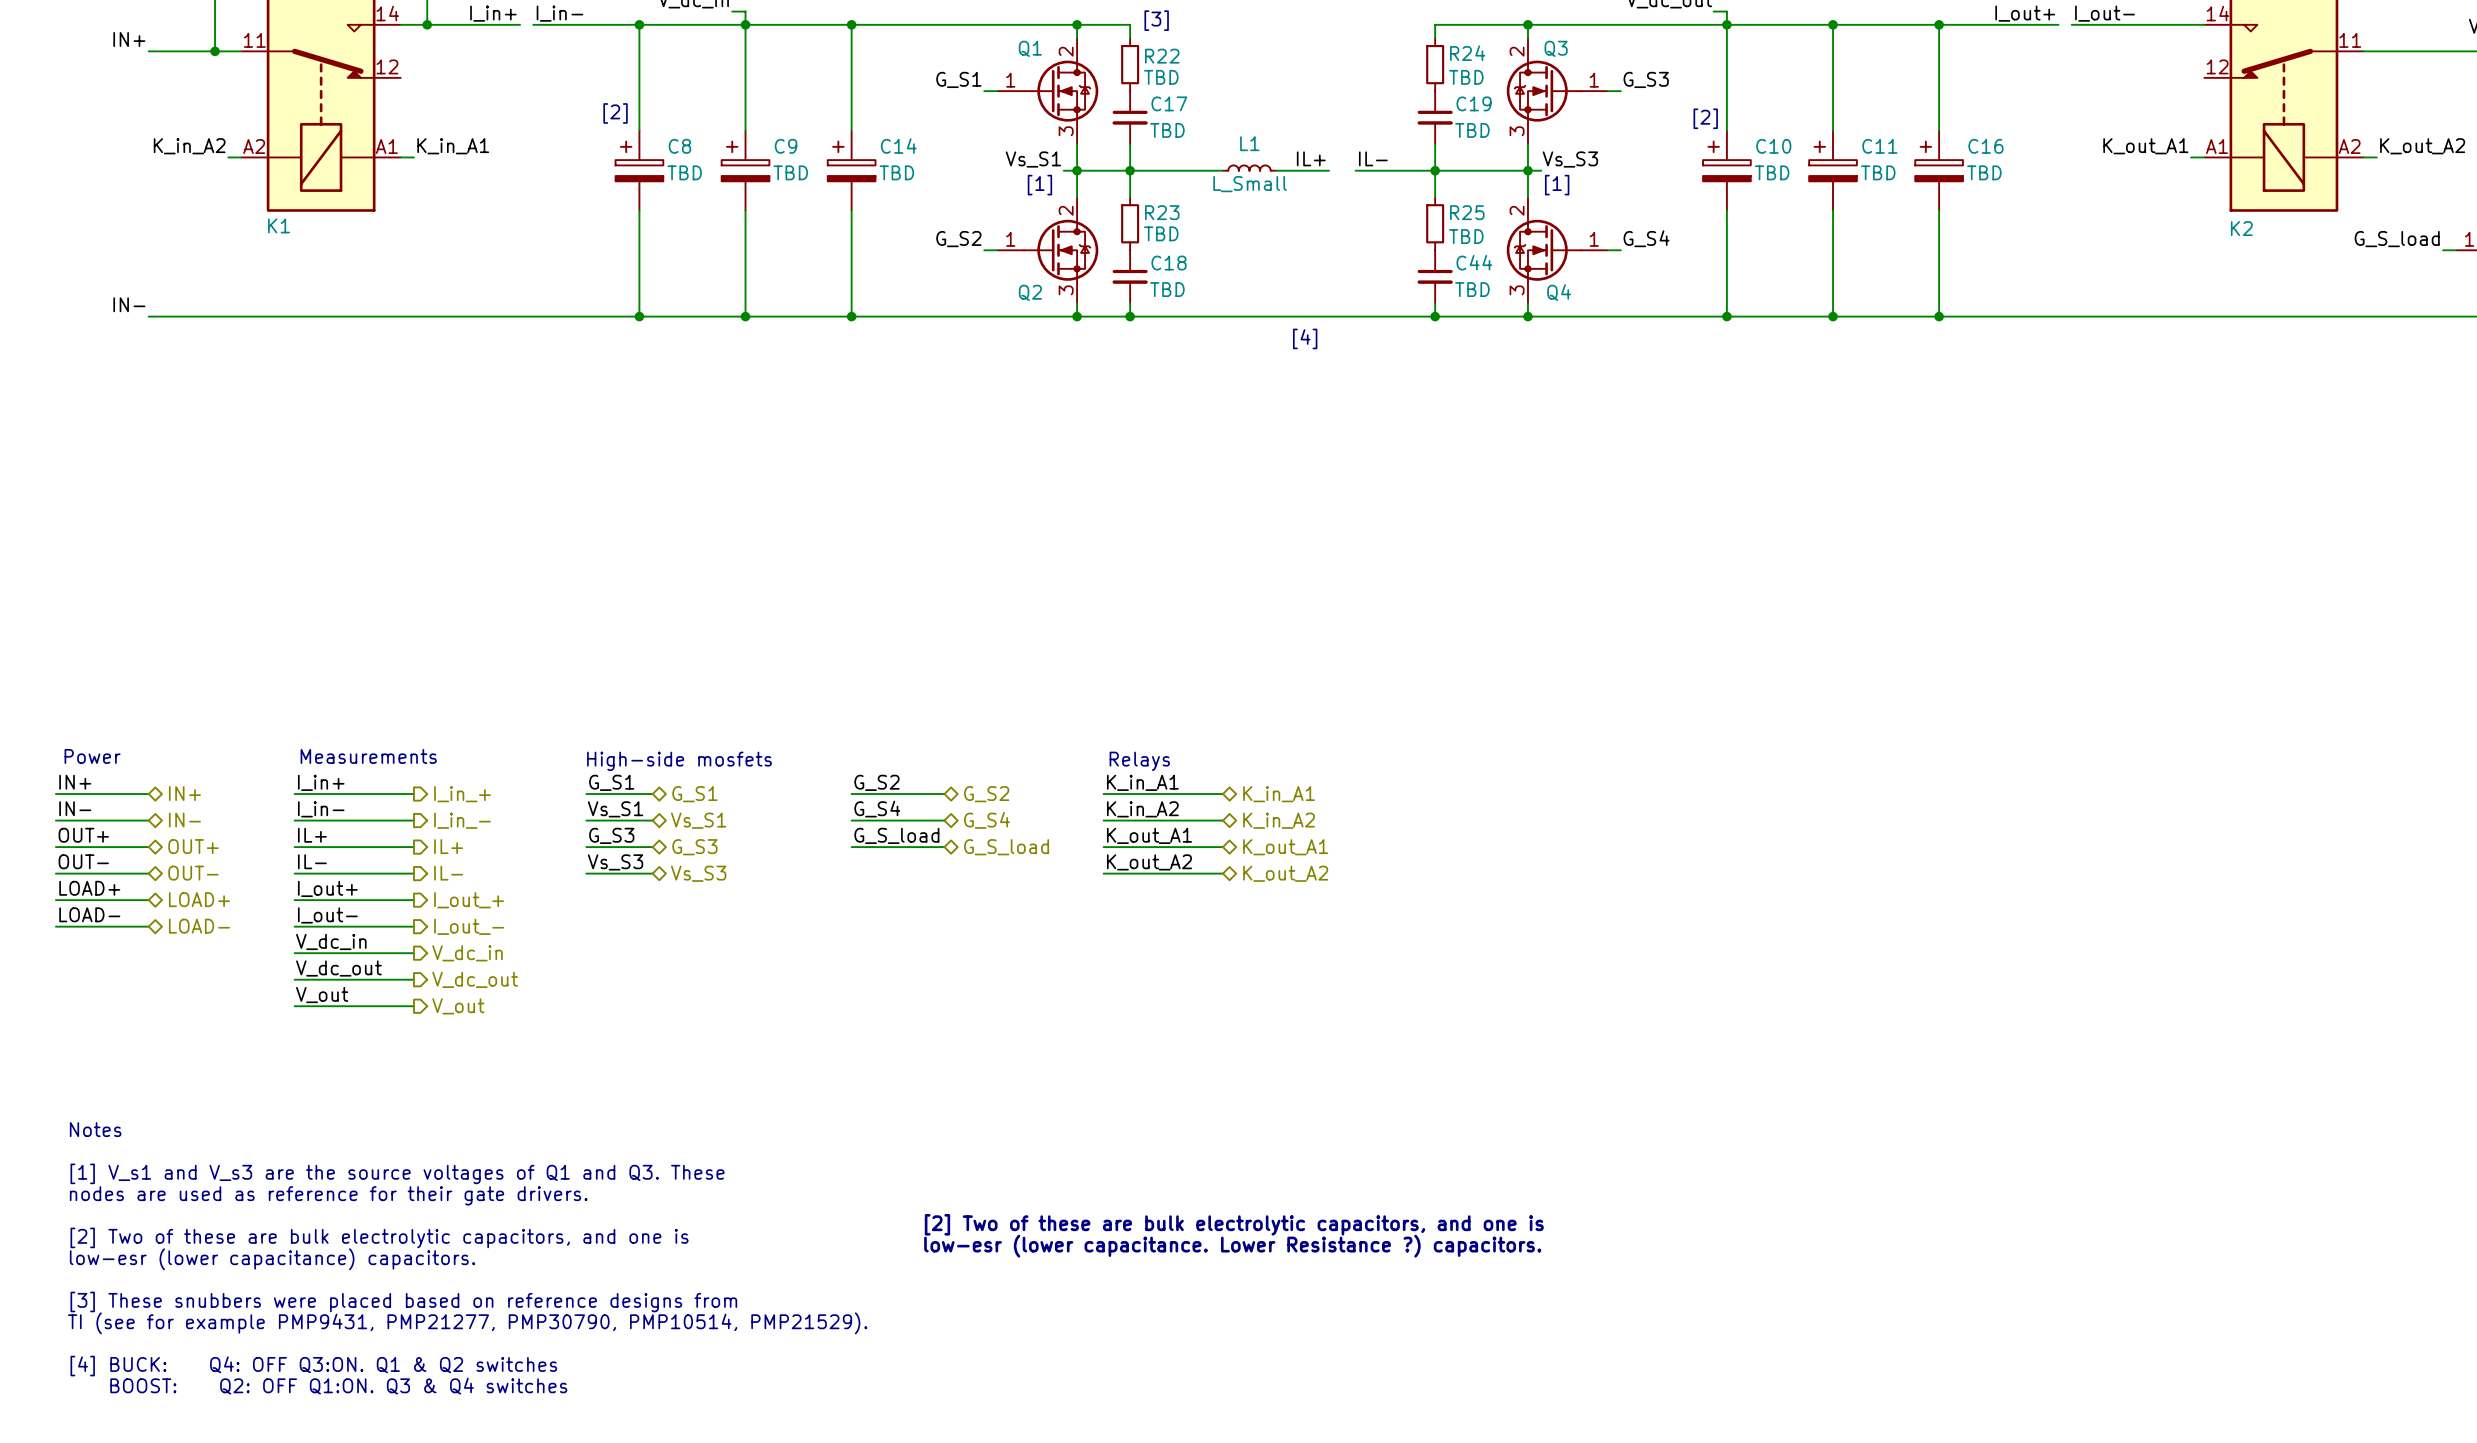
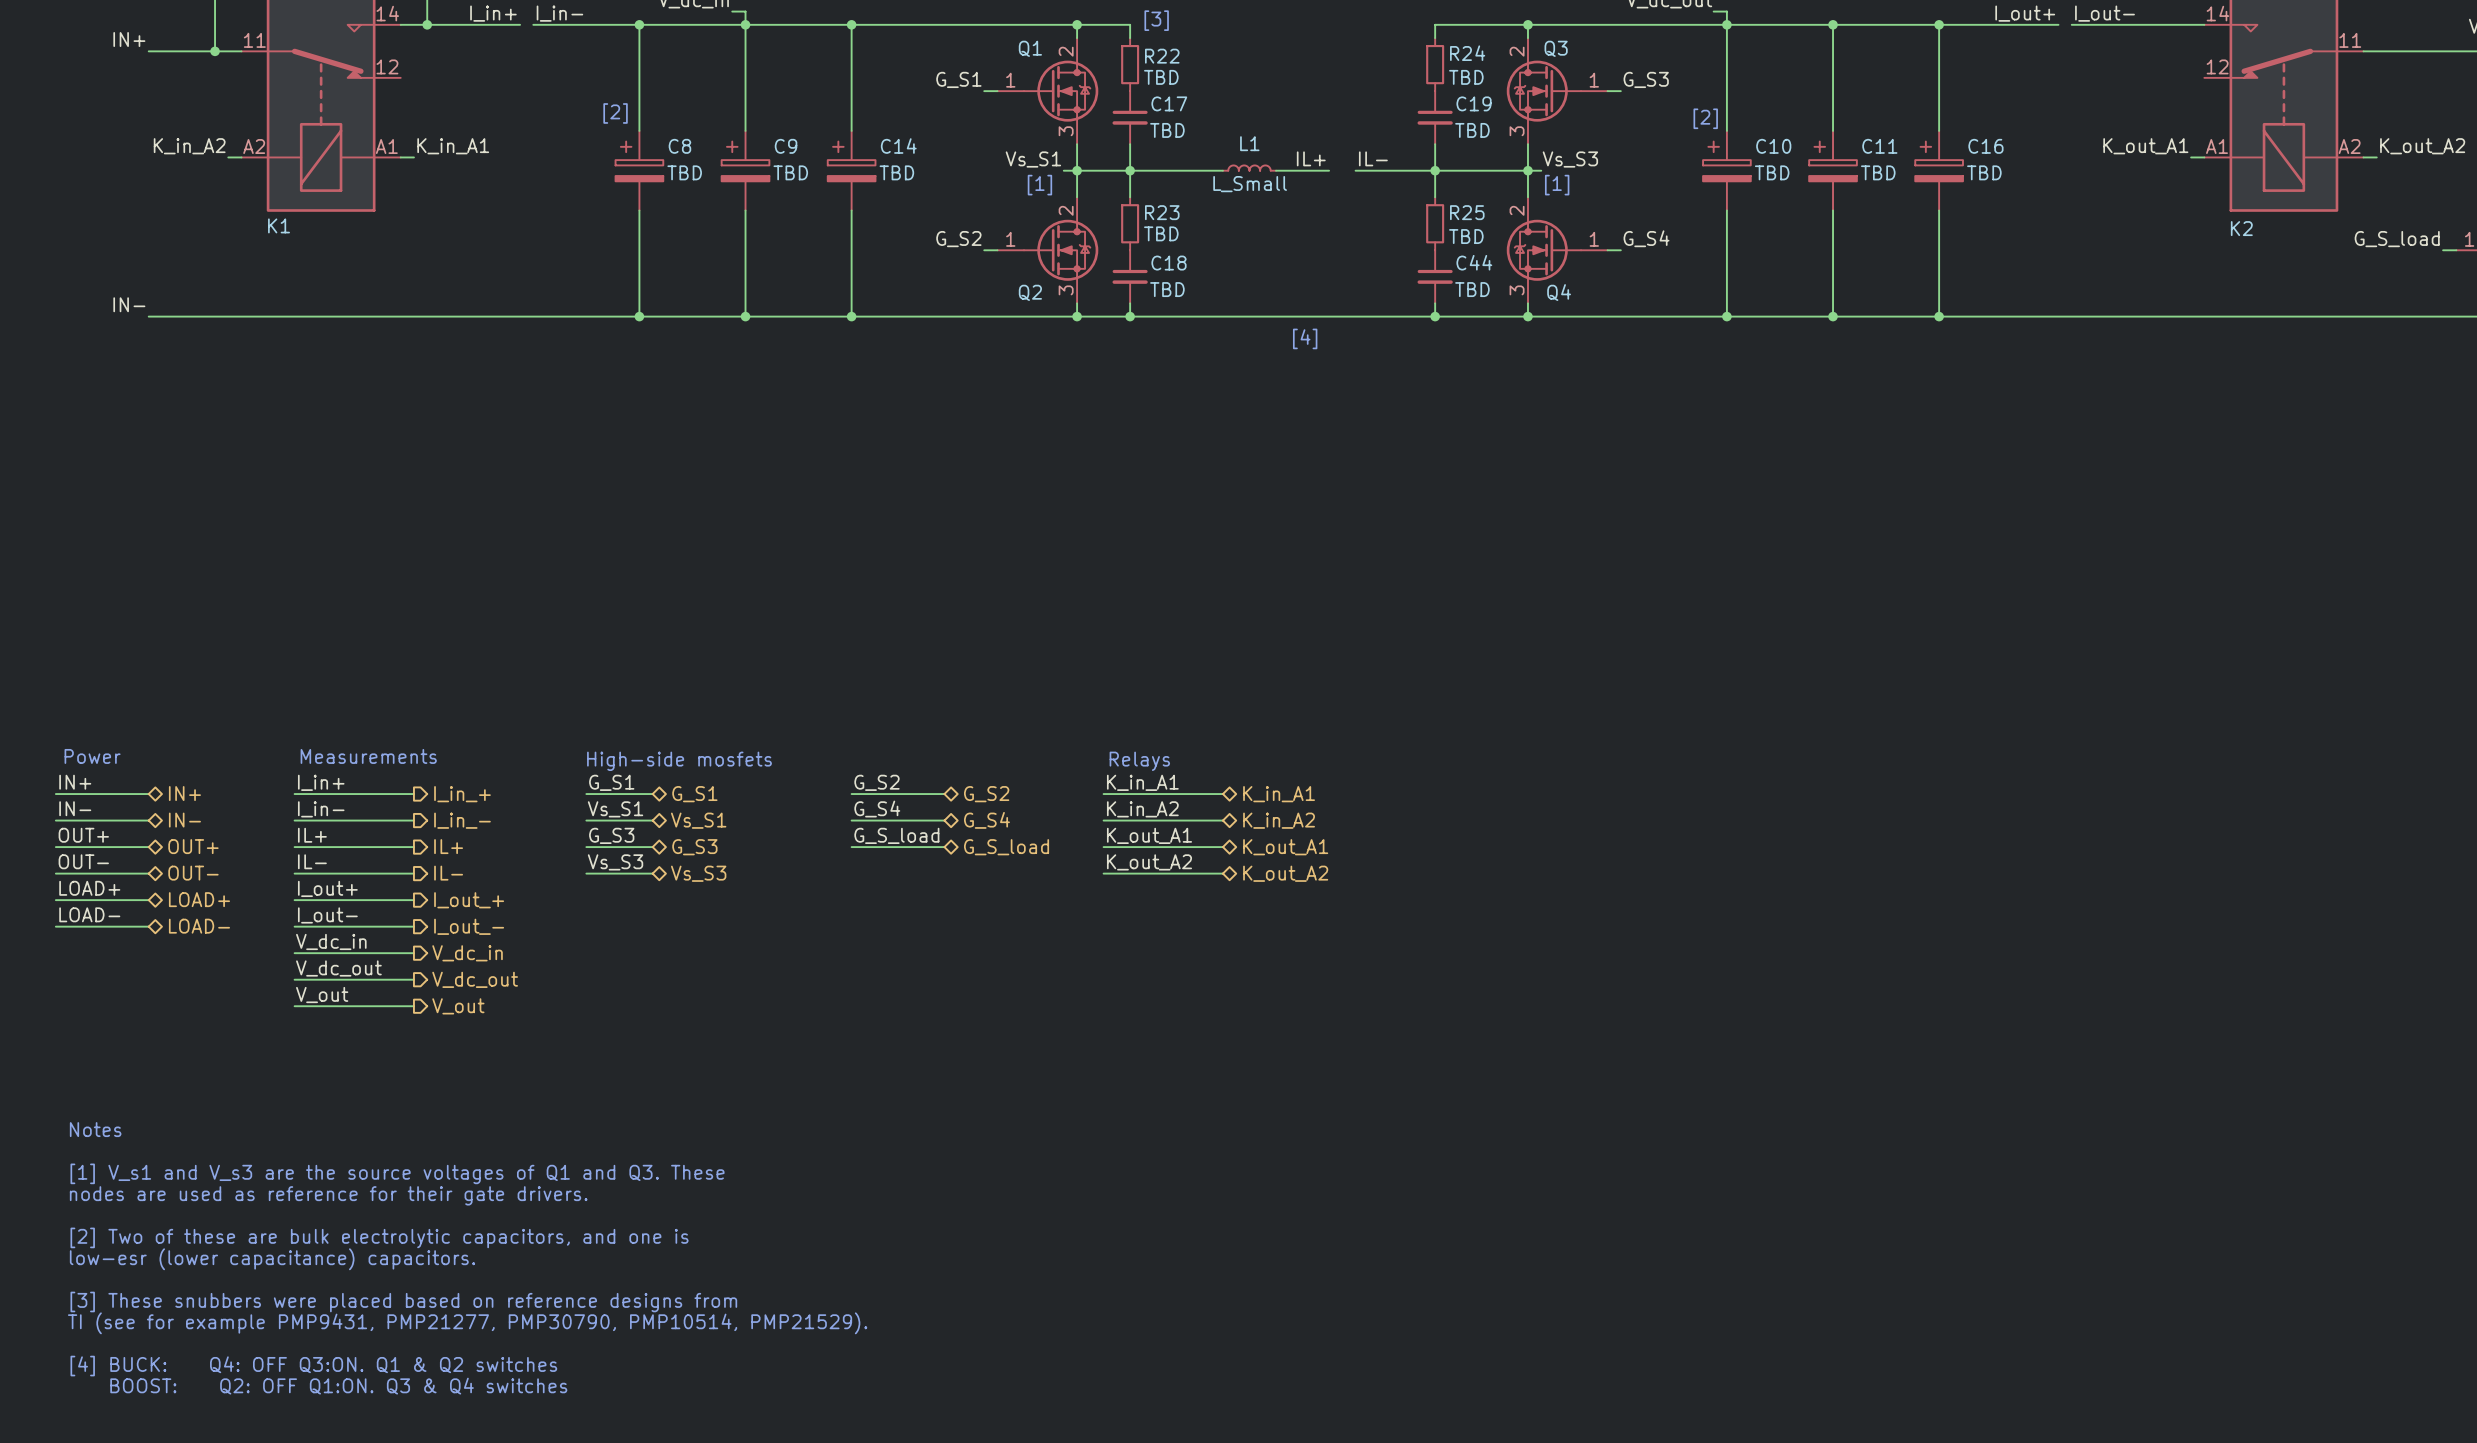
text: [2] Two of these are bulk electrolytic capacitors, and one is (1234, 1224) -> none
text: low-esr (lower capacitance. Lower Resistance ?) capacitors. (1232, 1246) -> none

